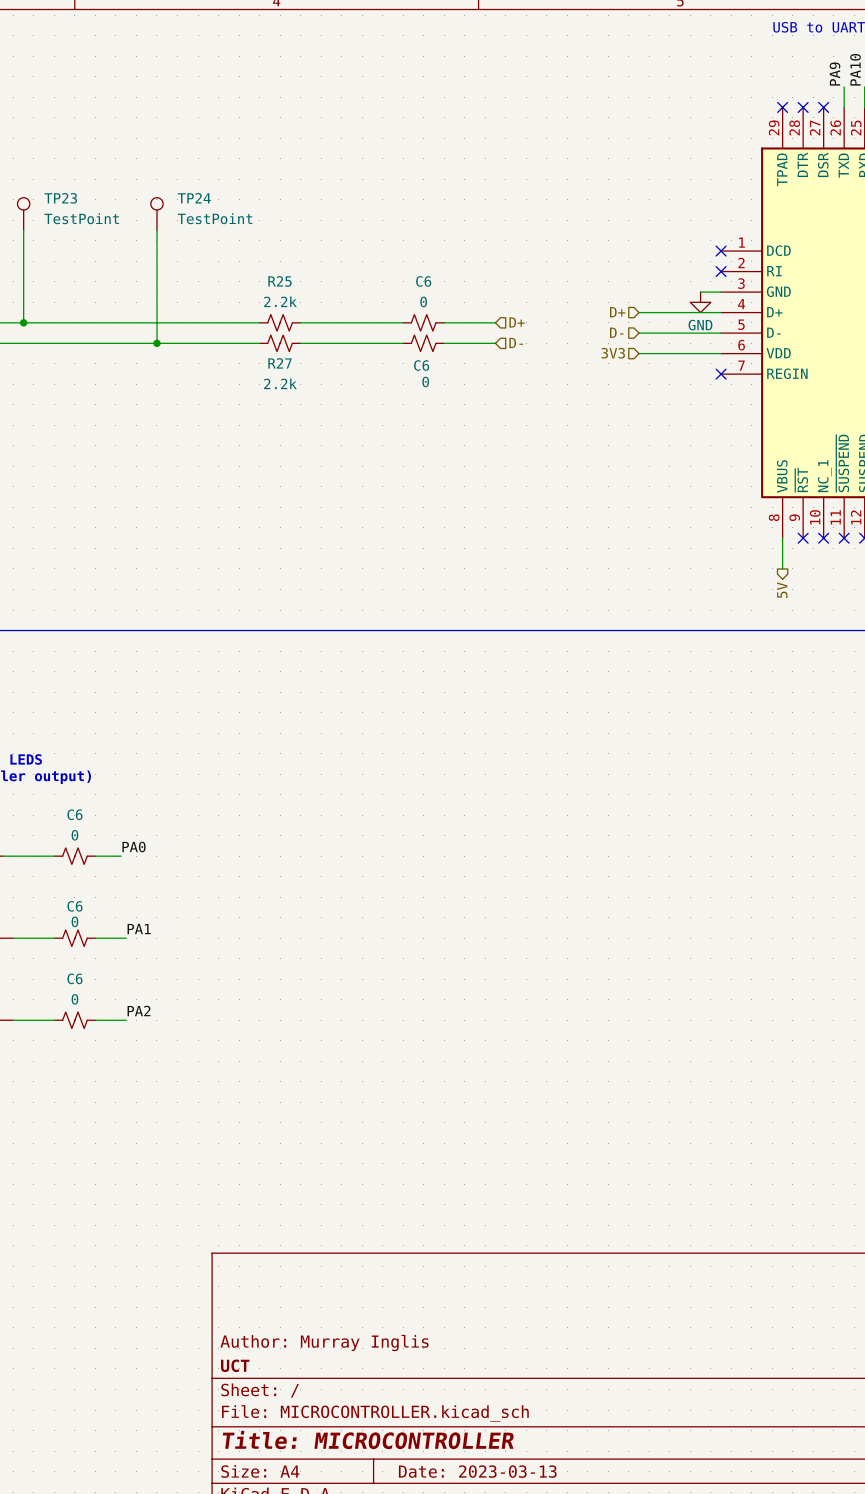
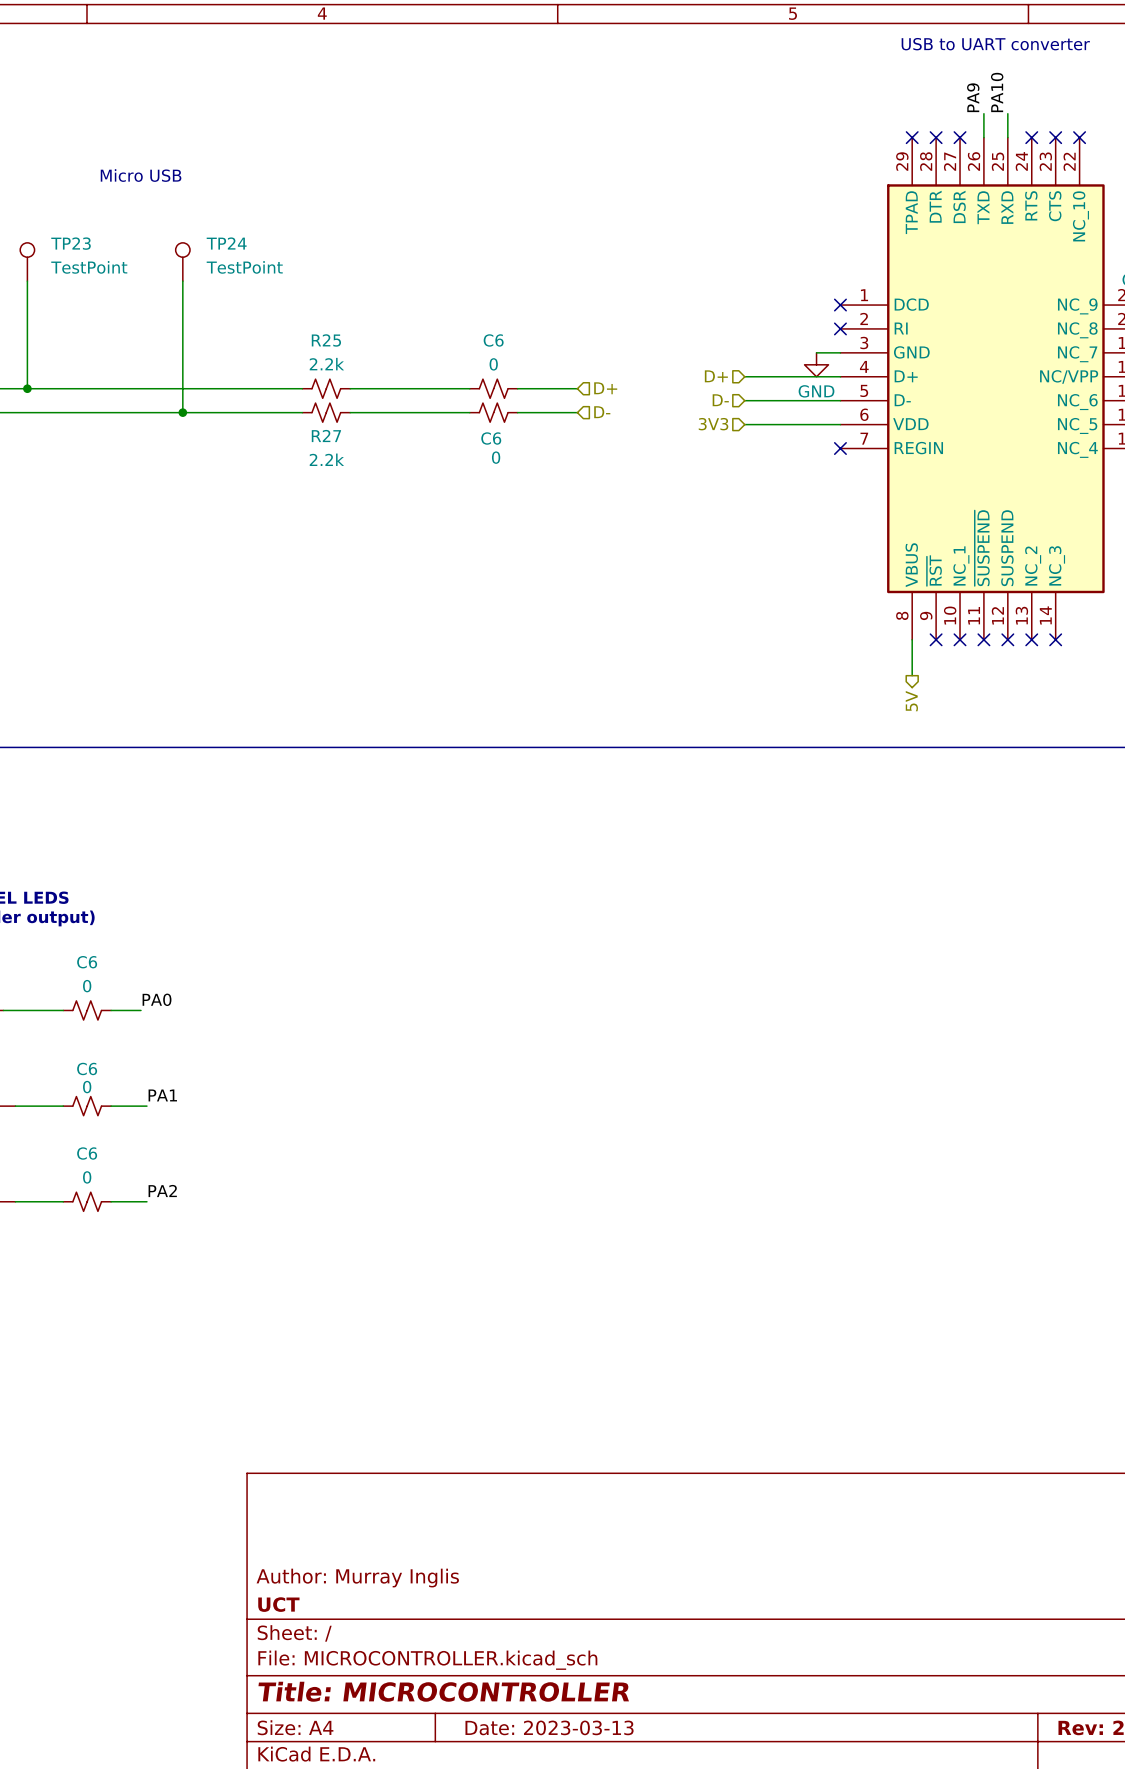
text: none -> Micro USB (141, 175)

